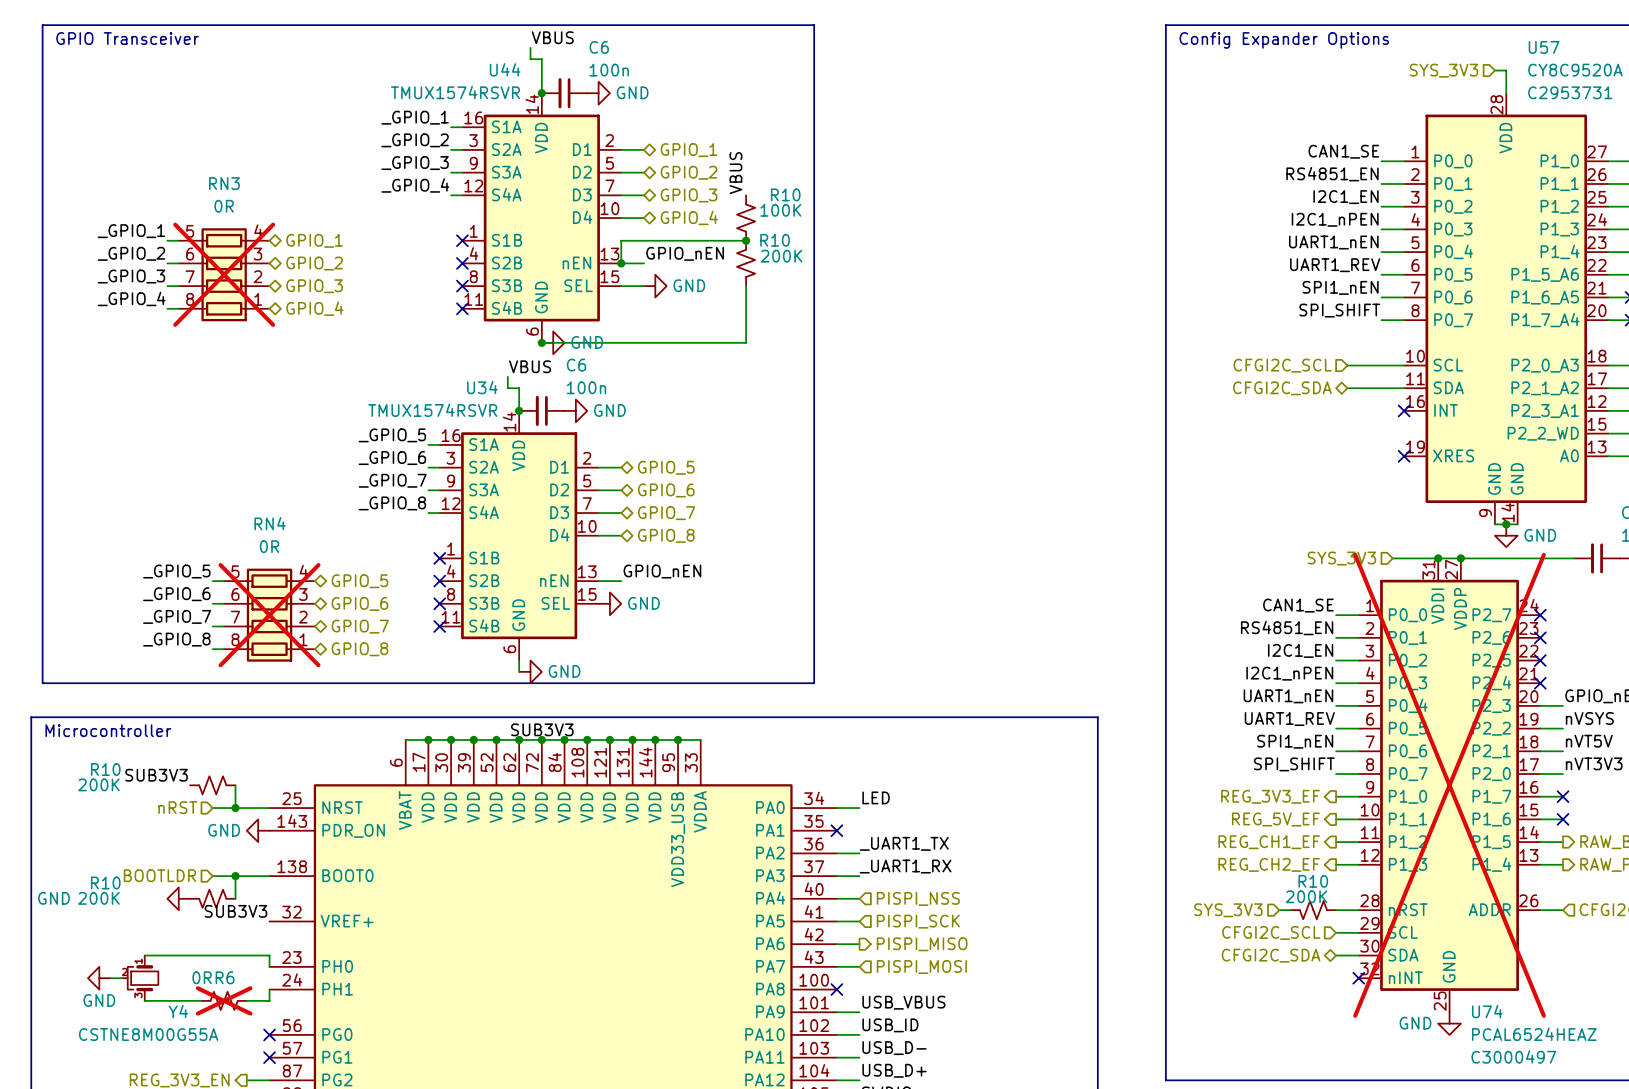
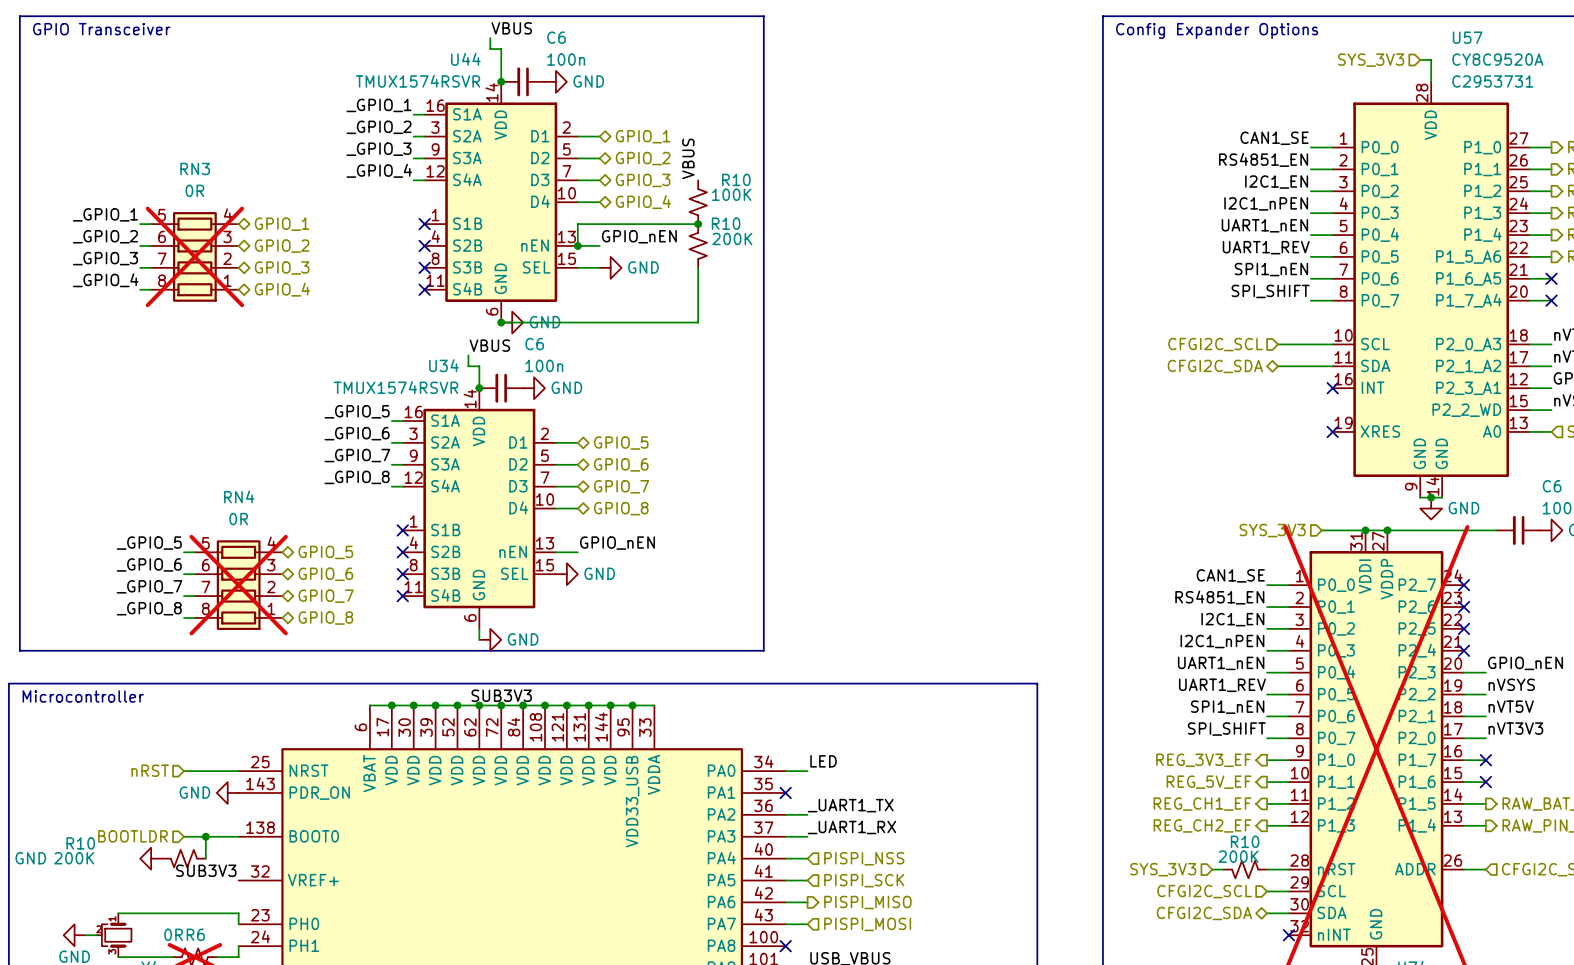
label: SUB3V3 (156, 775) -> none
R10: 200K (212, 785) -> none
wire: (235, 785) (235, 808) -> none
junction: (235, 808) -> none

